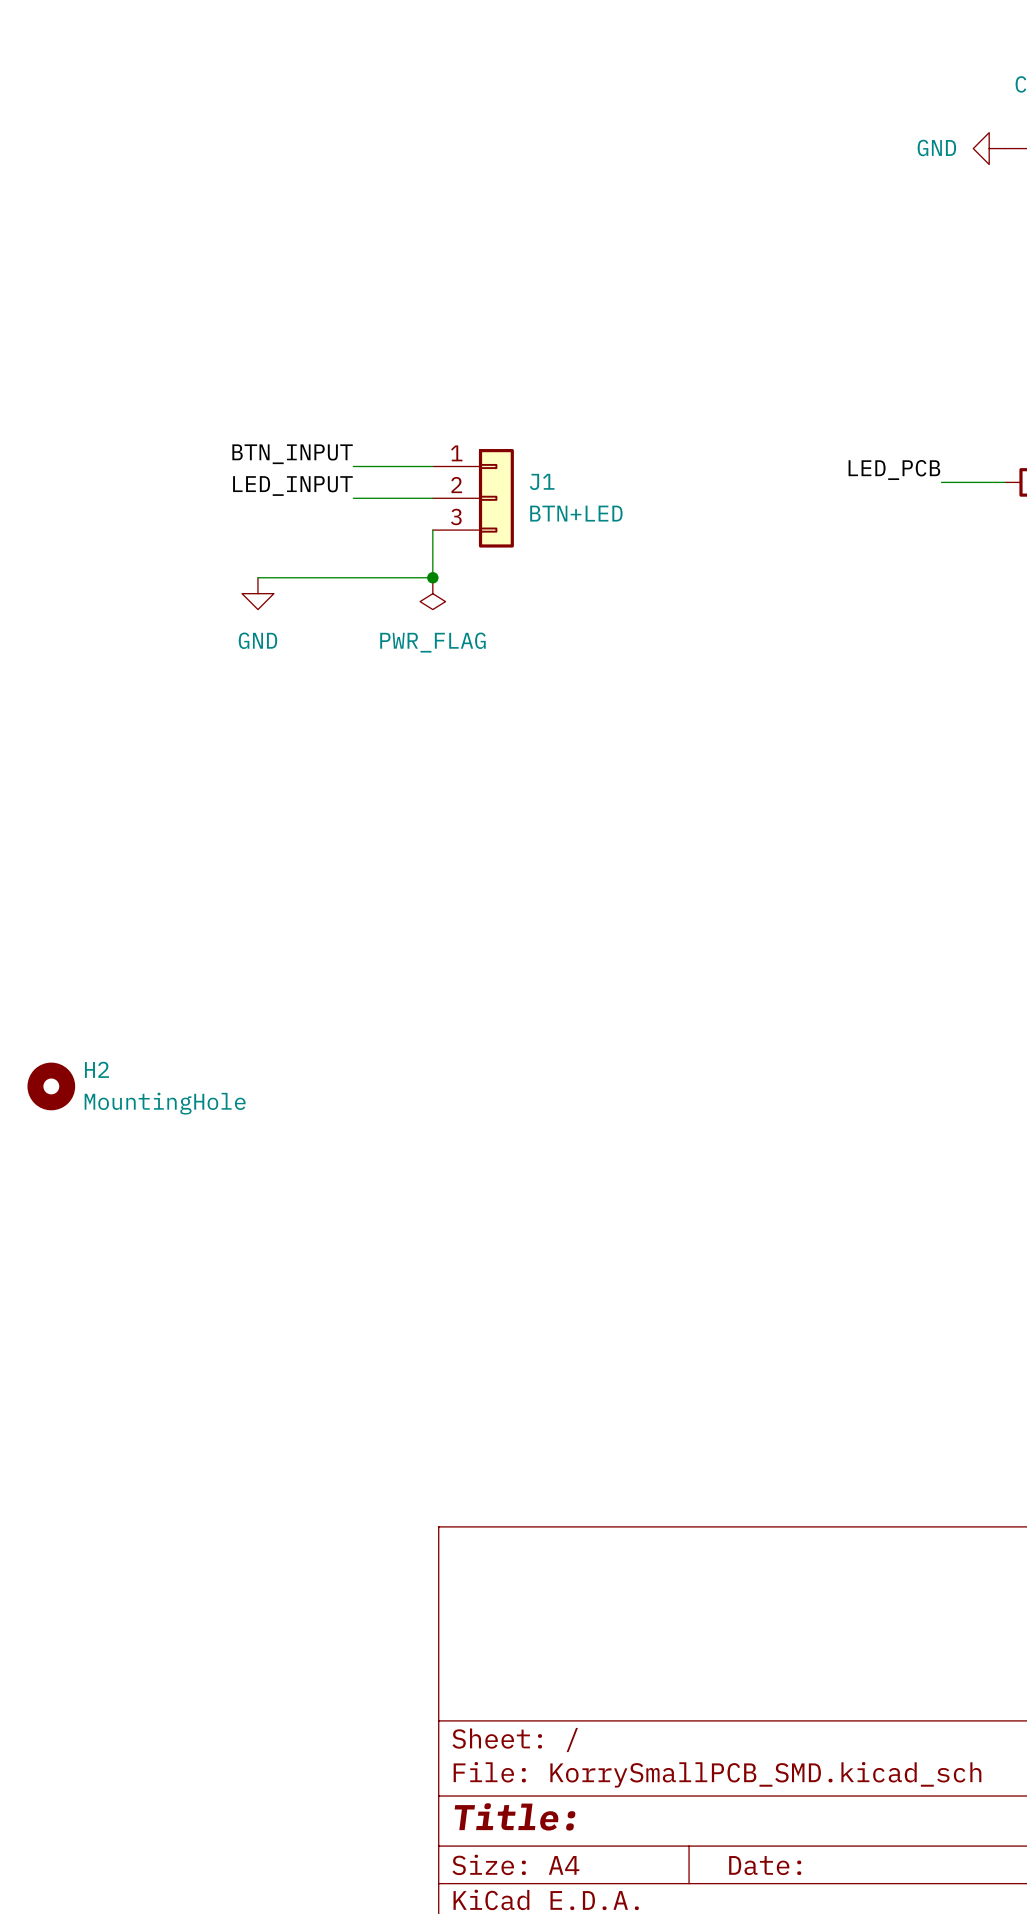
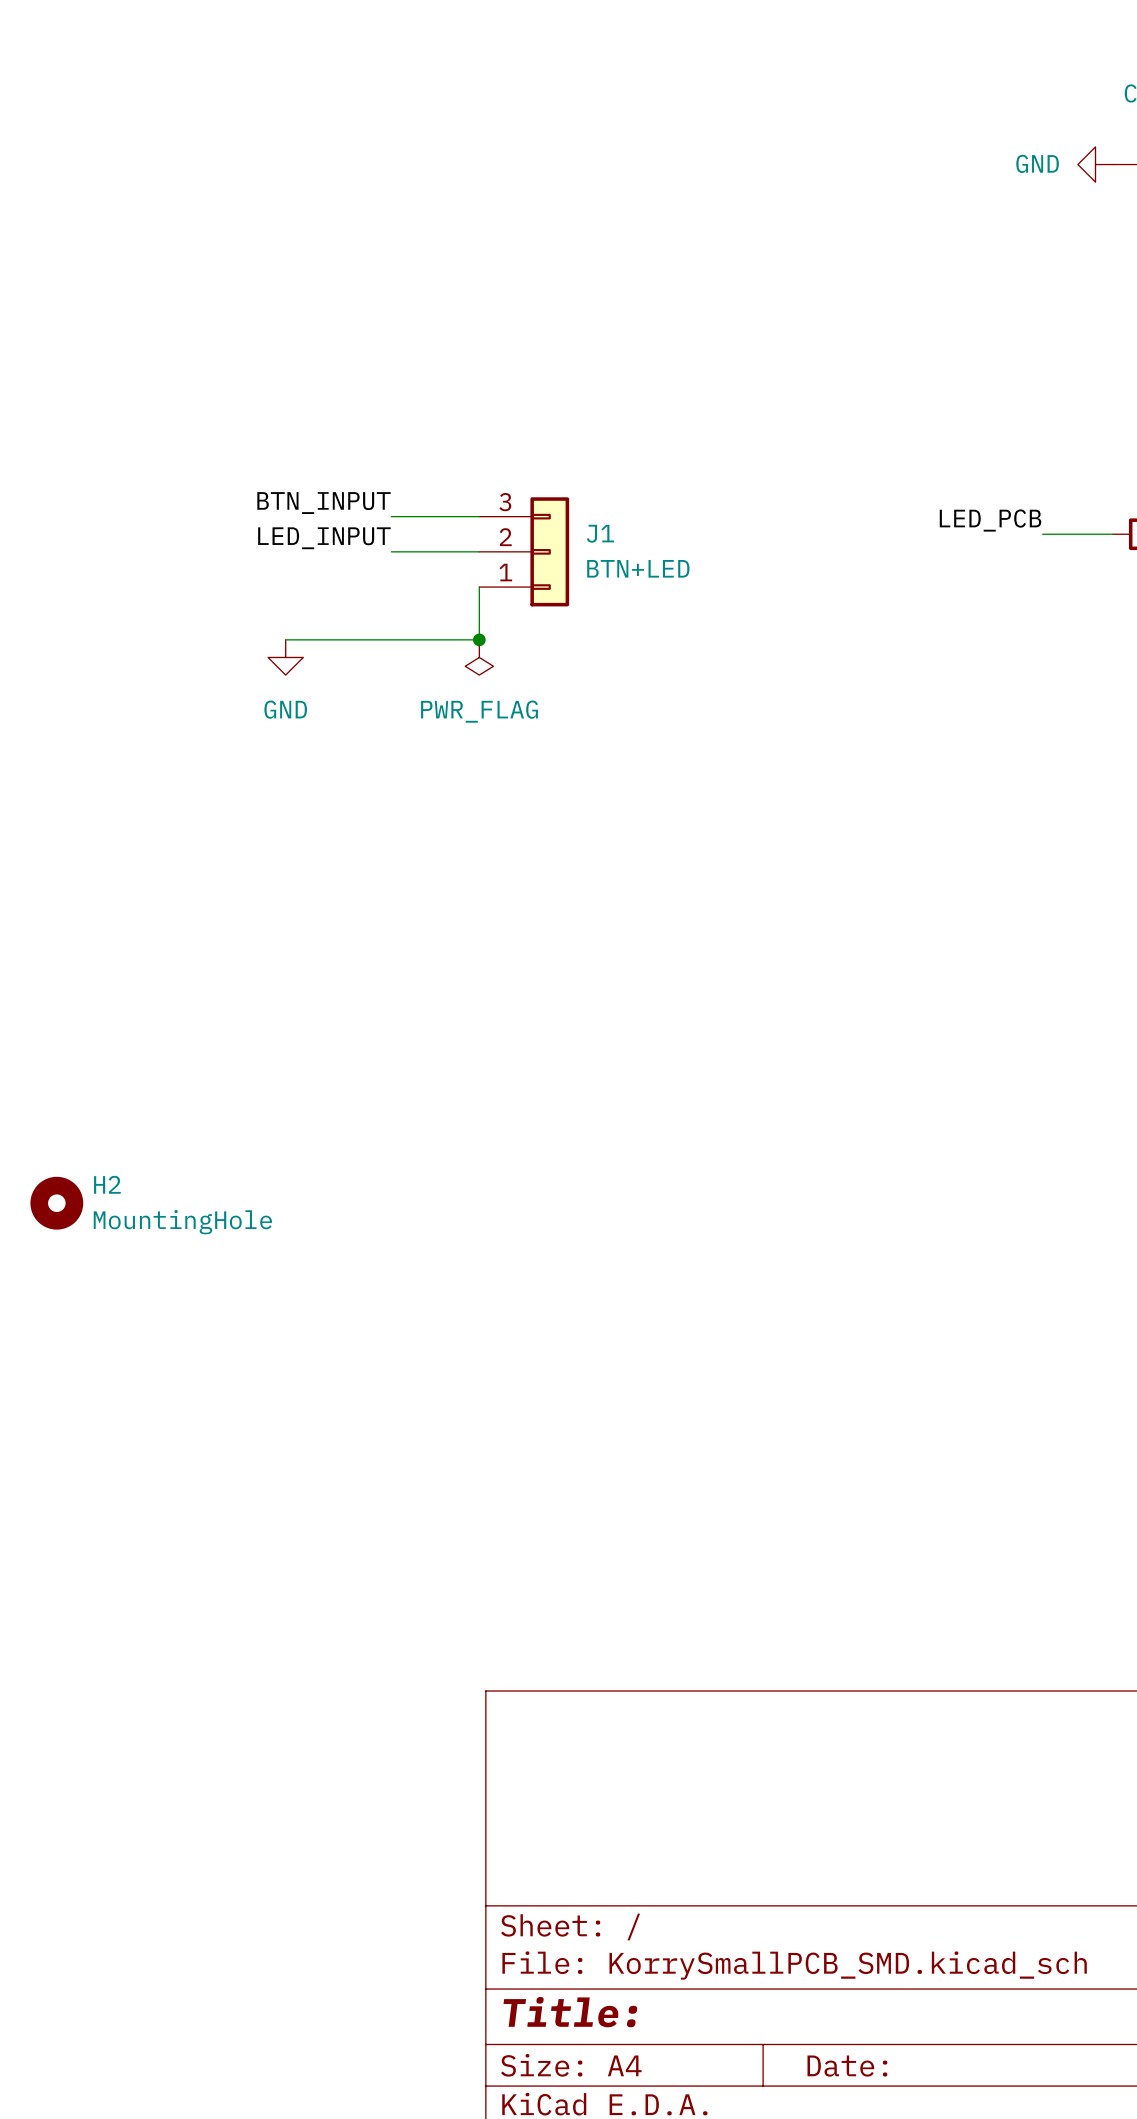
J1 flip: as is (496, 498) -> up-down (549, 551)

